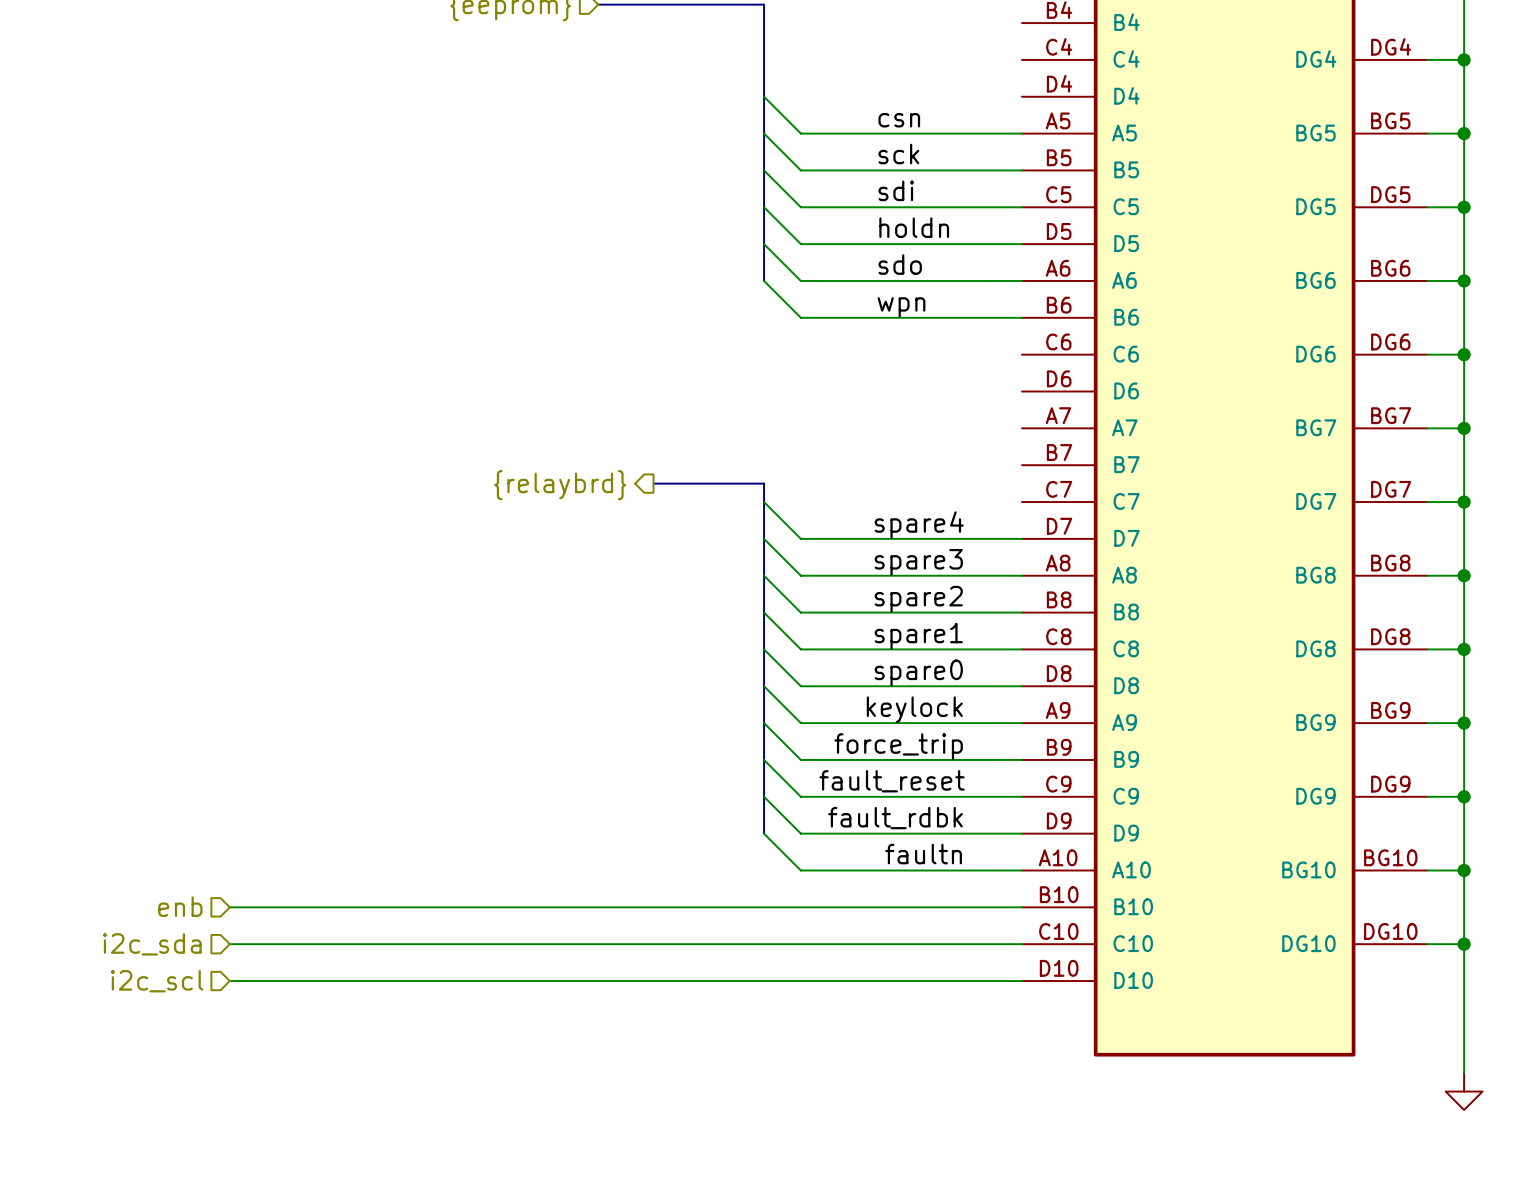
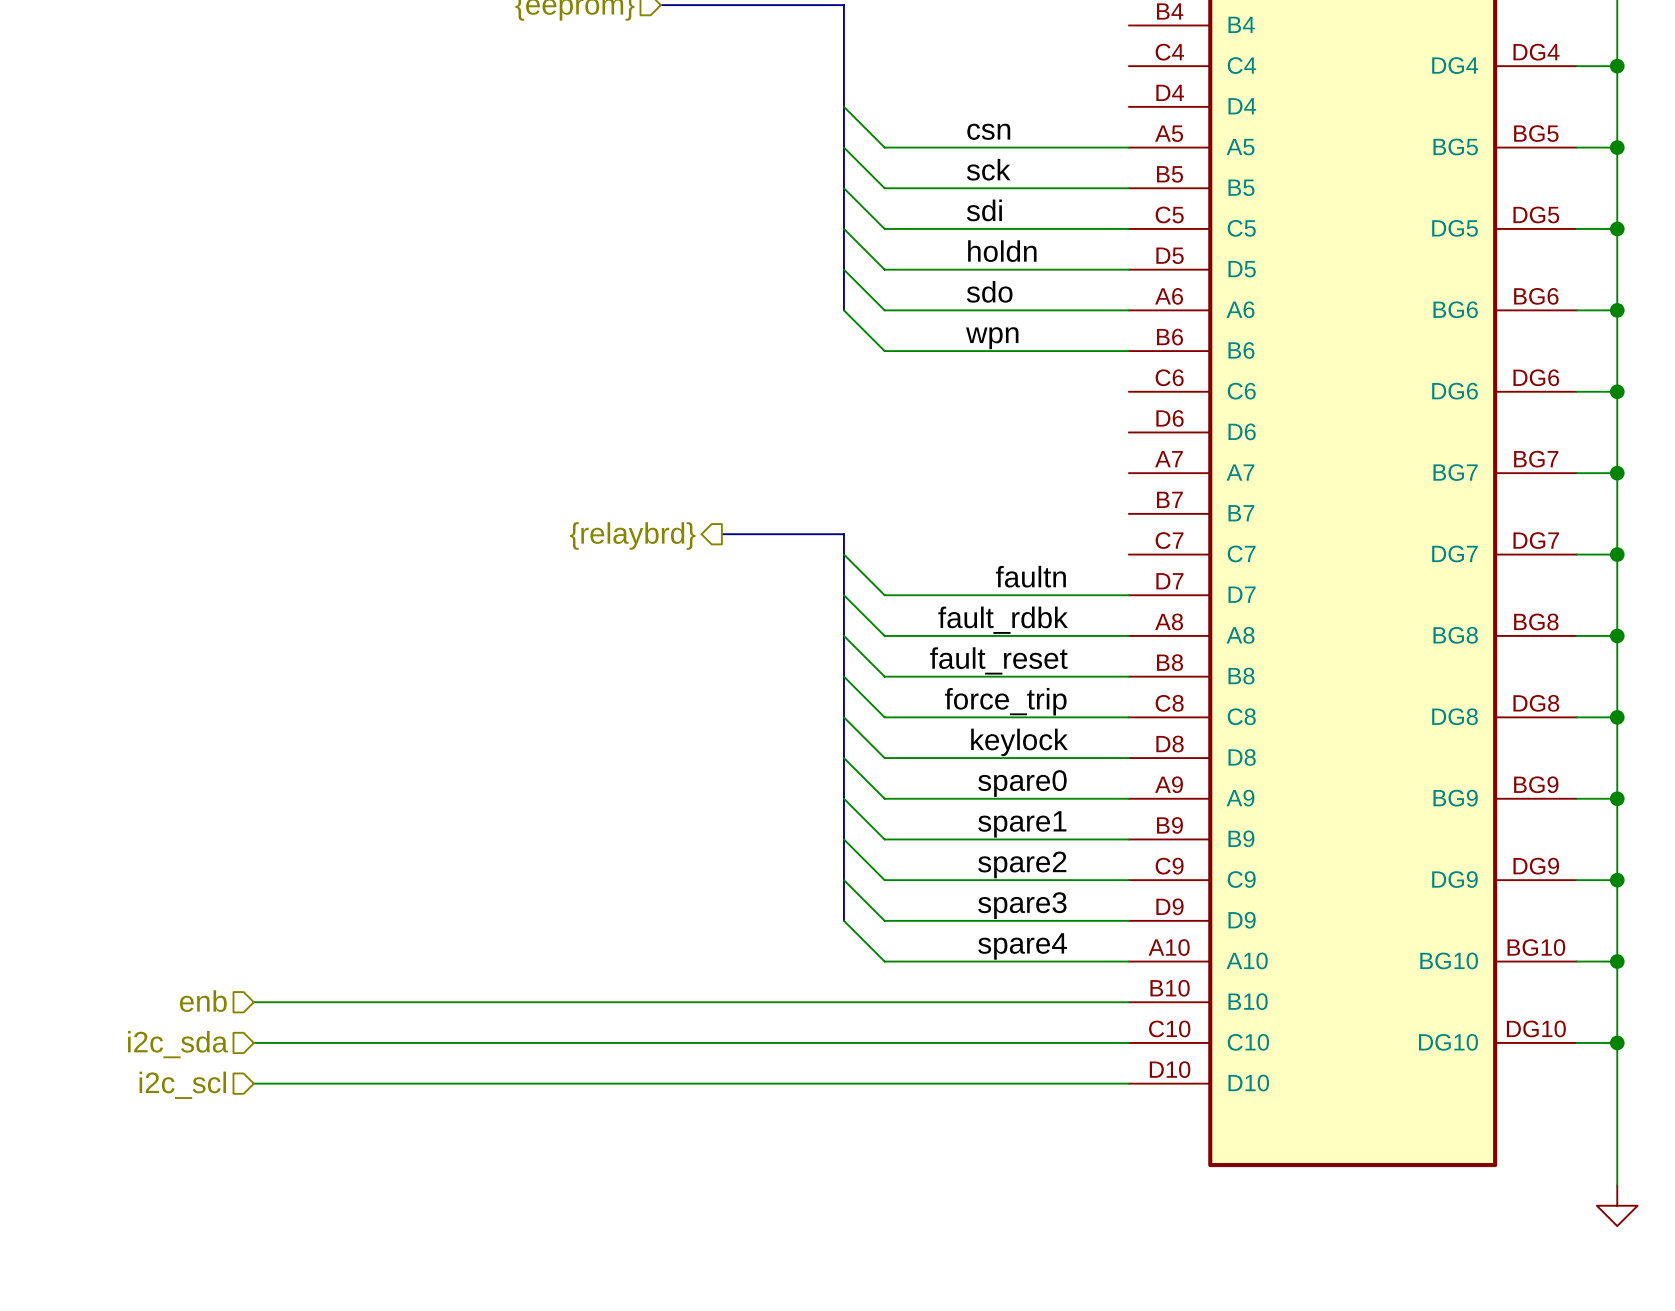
label: spare4 (919, 525) -> faultn (1030, 576)
label: spare3 (918, 562) -> fault_rdbk (1003, 620)
label: spare2 (918, 599) -> fault_reset (998, 660)
label: spare1 (918, 636) -> force_trip (1005, 701)
label: spare0 (918, 672) -> keylock (1019, 742)
label: keylock (914, 709) -> spare0 (1022, 783)
label: force_trip (898, 746) -> spare1 (1022, 824)
label: fault_reset (891, 781) -> spare2 (1022, 864)
label: fault_rdbk (895, 818) -> spare3 (1022, 905)
label: faultn (923, 854) -> spare4 (1022, 946)

